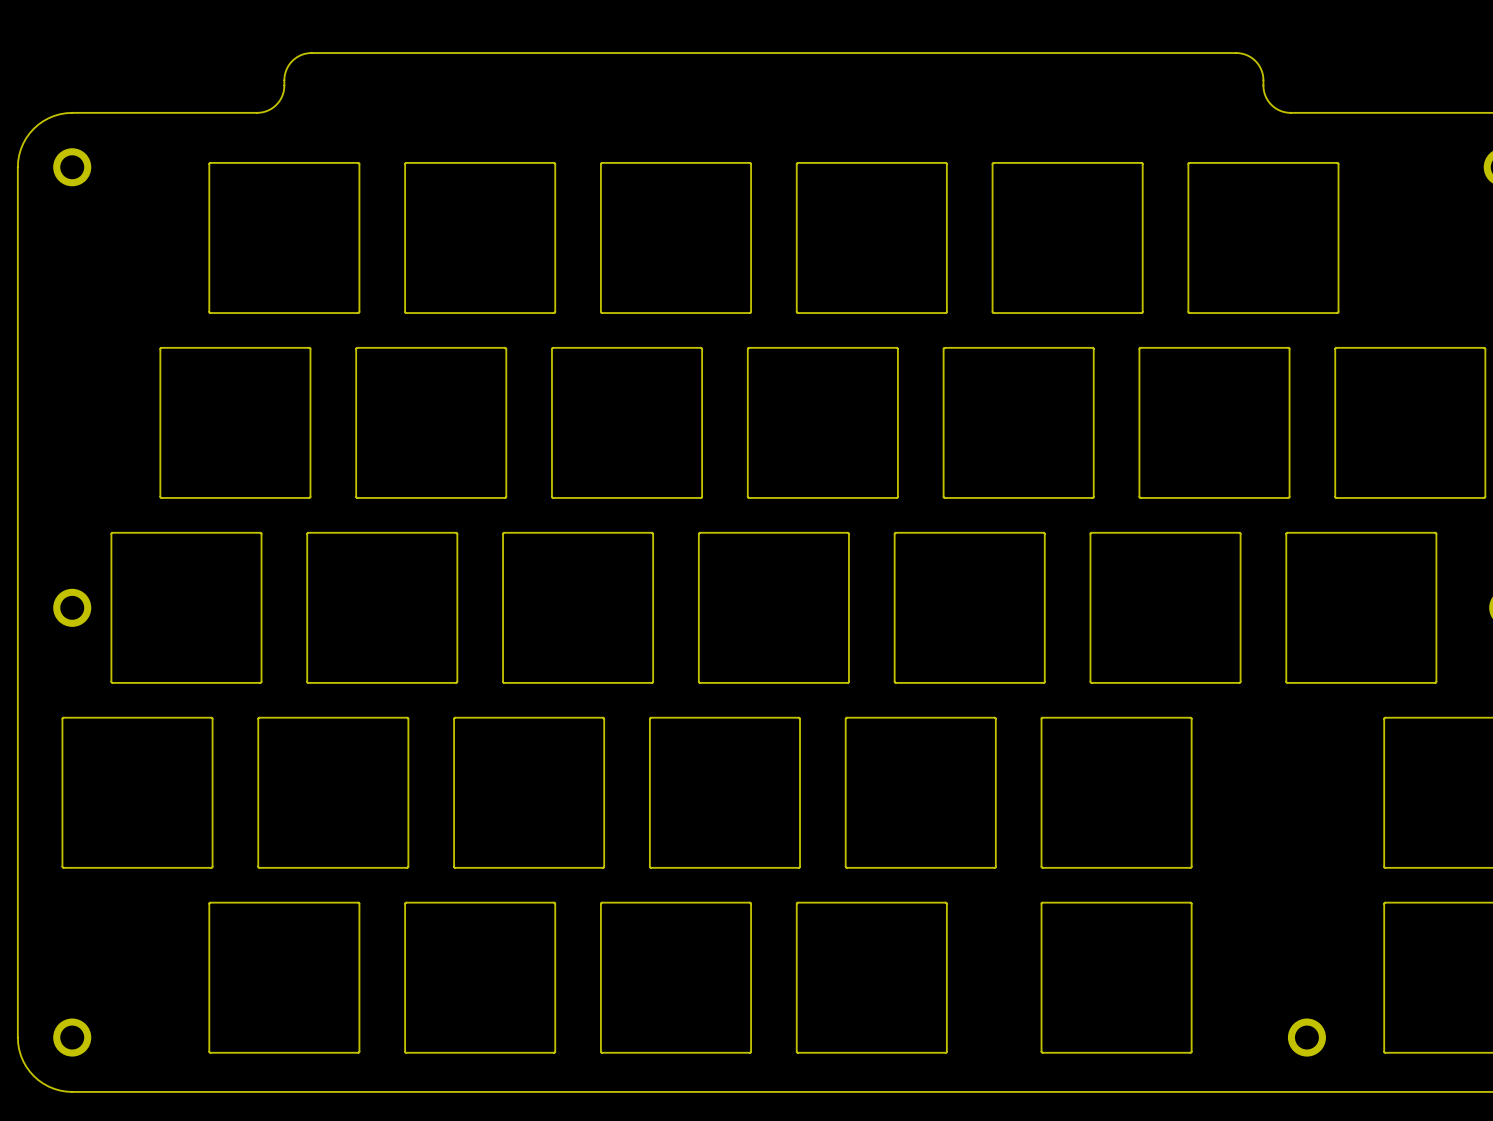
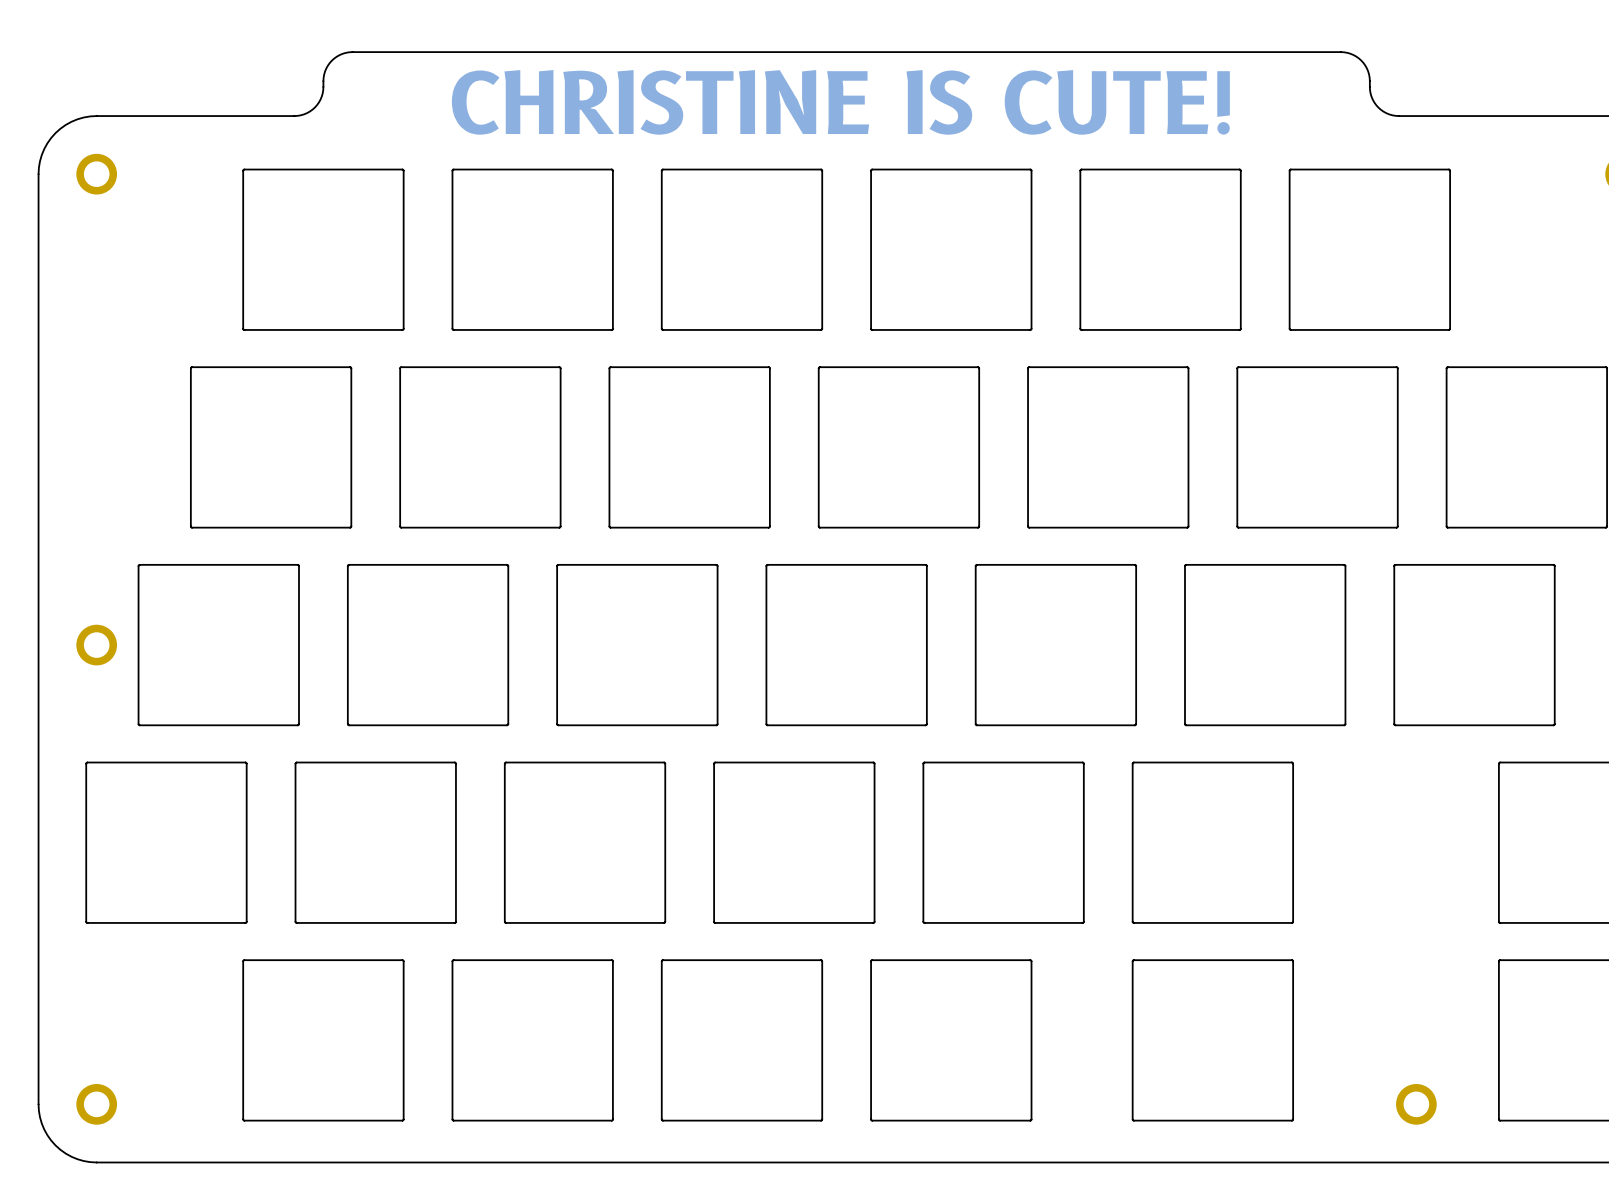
text: none -> CHRISTINE IS CUTE! (840, 102)

